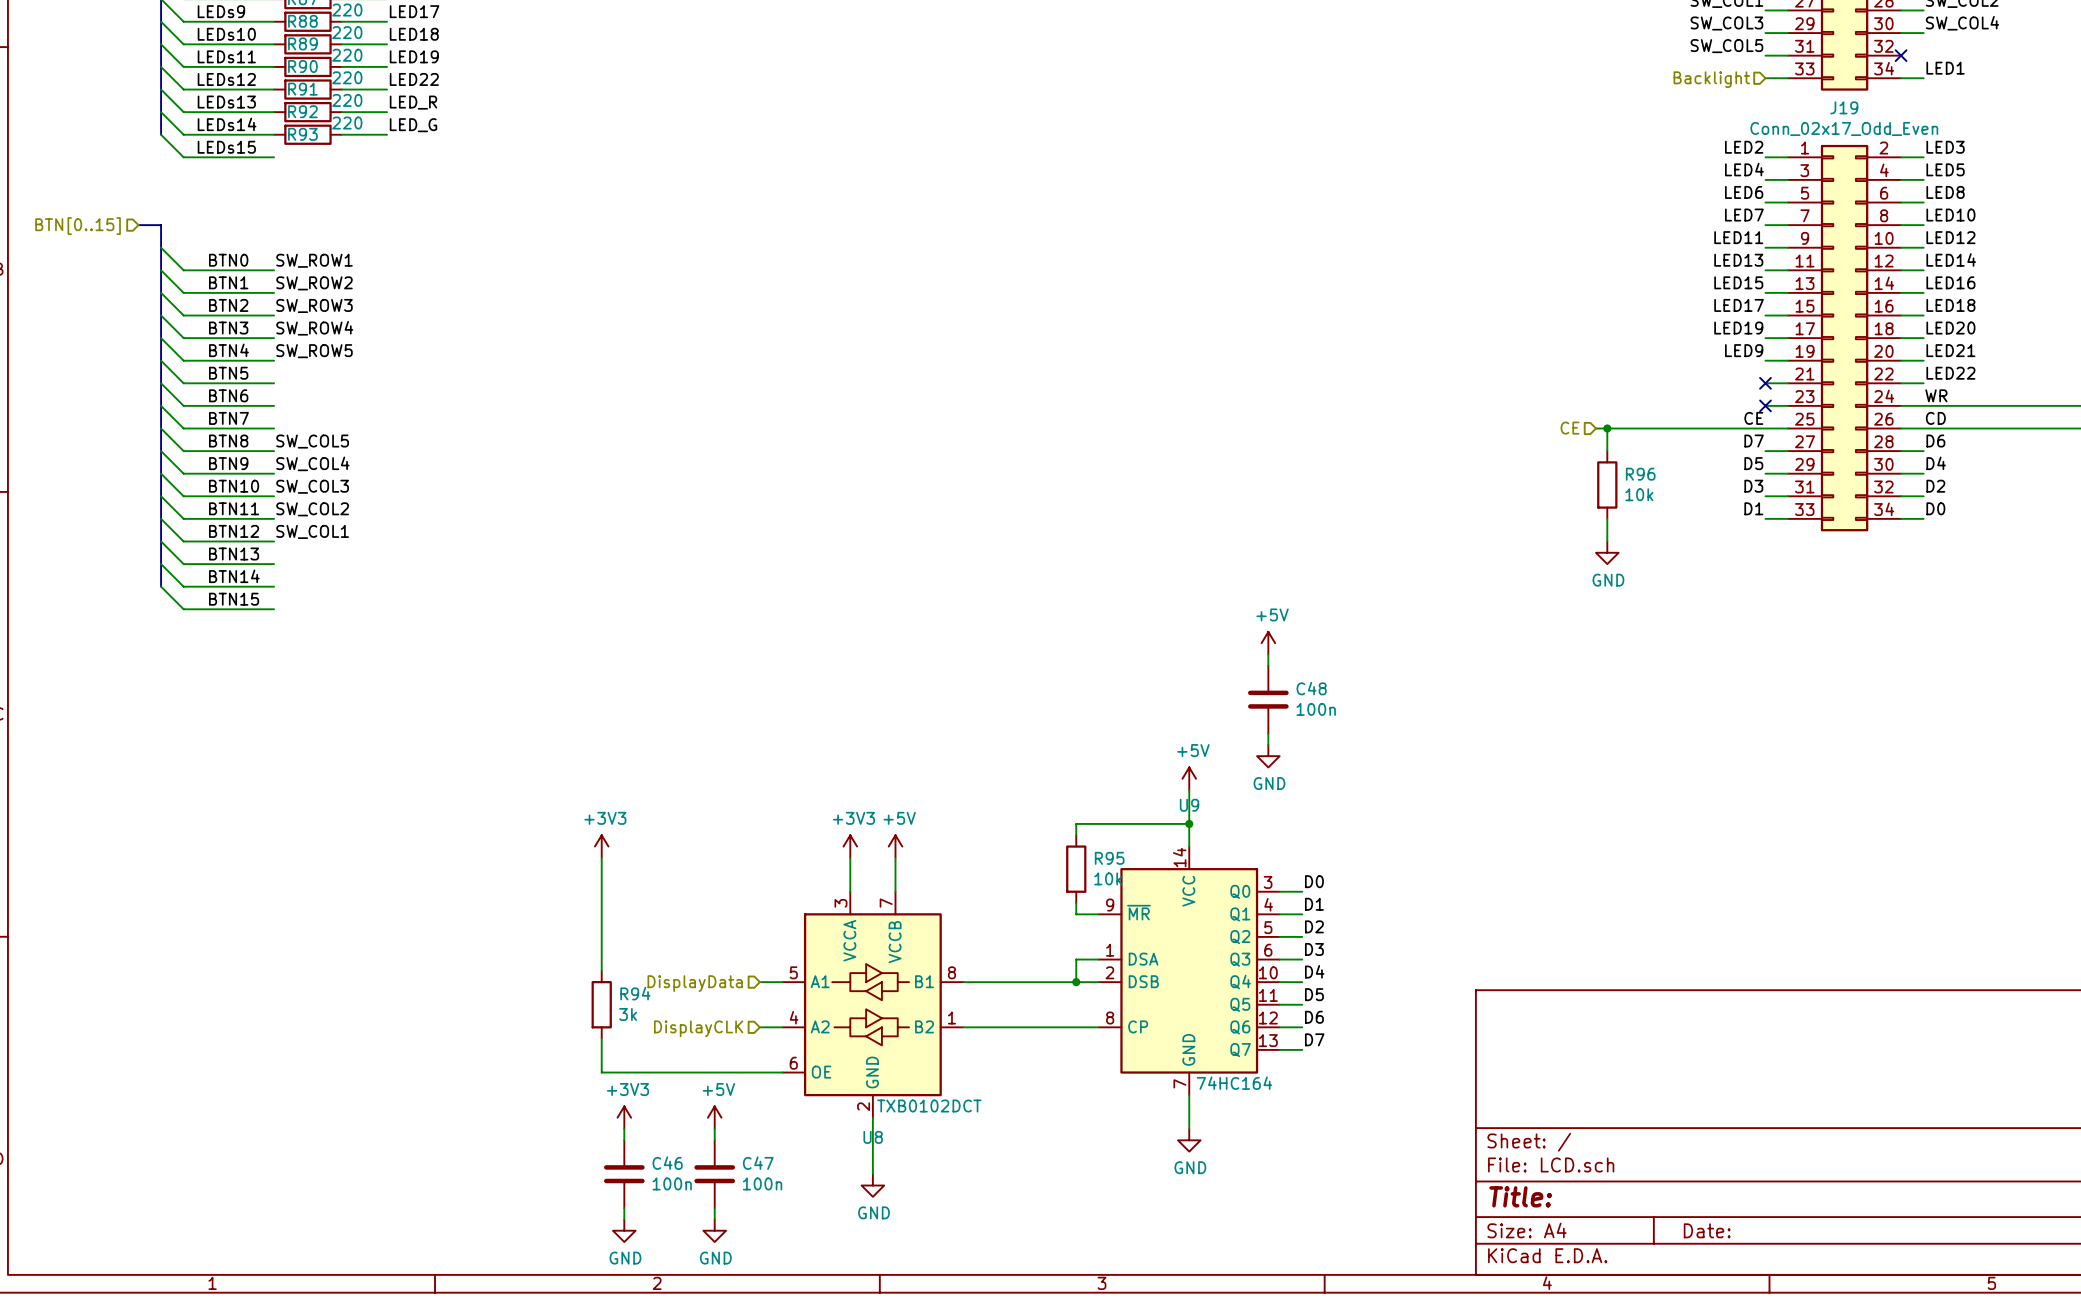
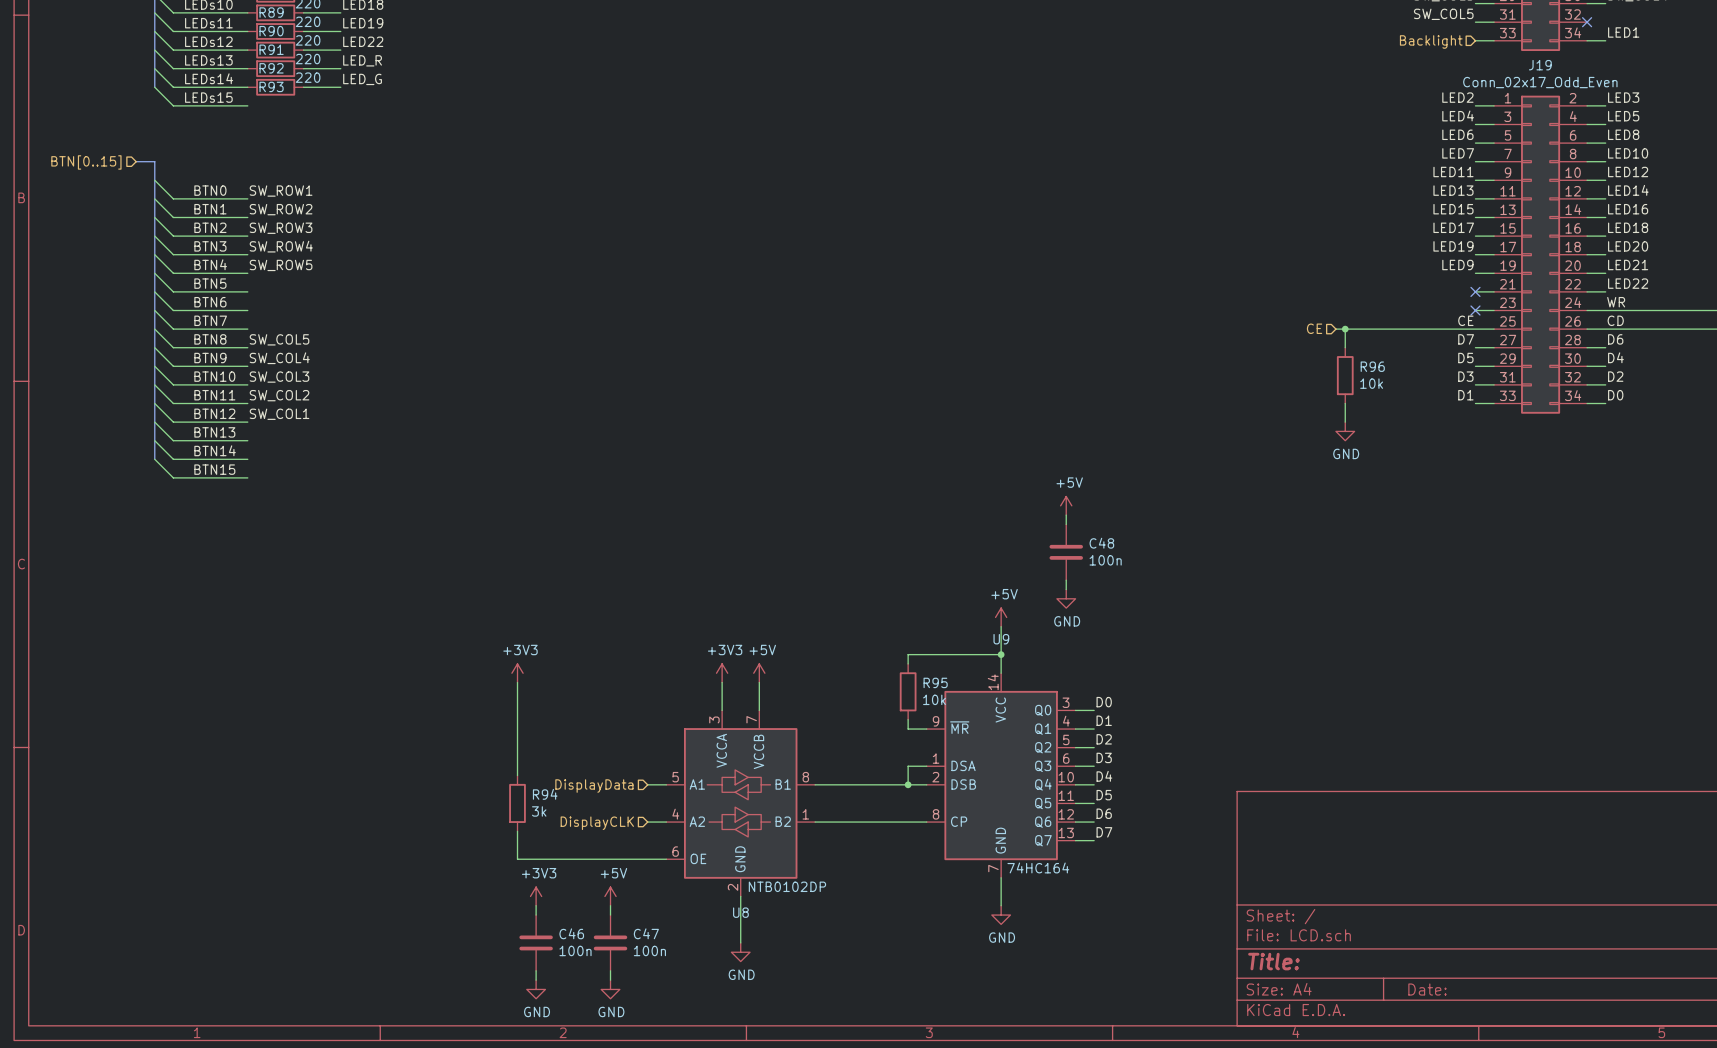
U8 value: TXB0102DCT (929, 1106) -> NTB0102DP (787, 886)

